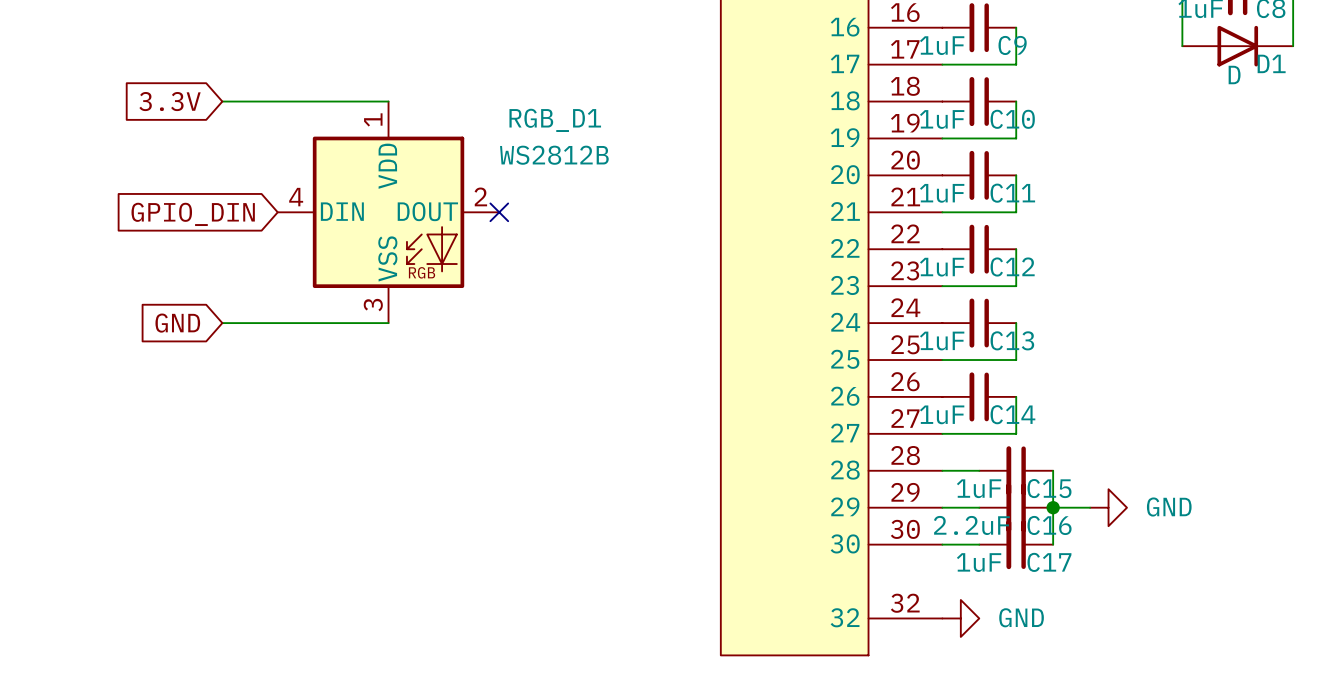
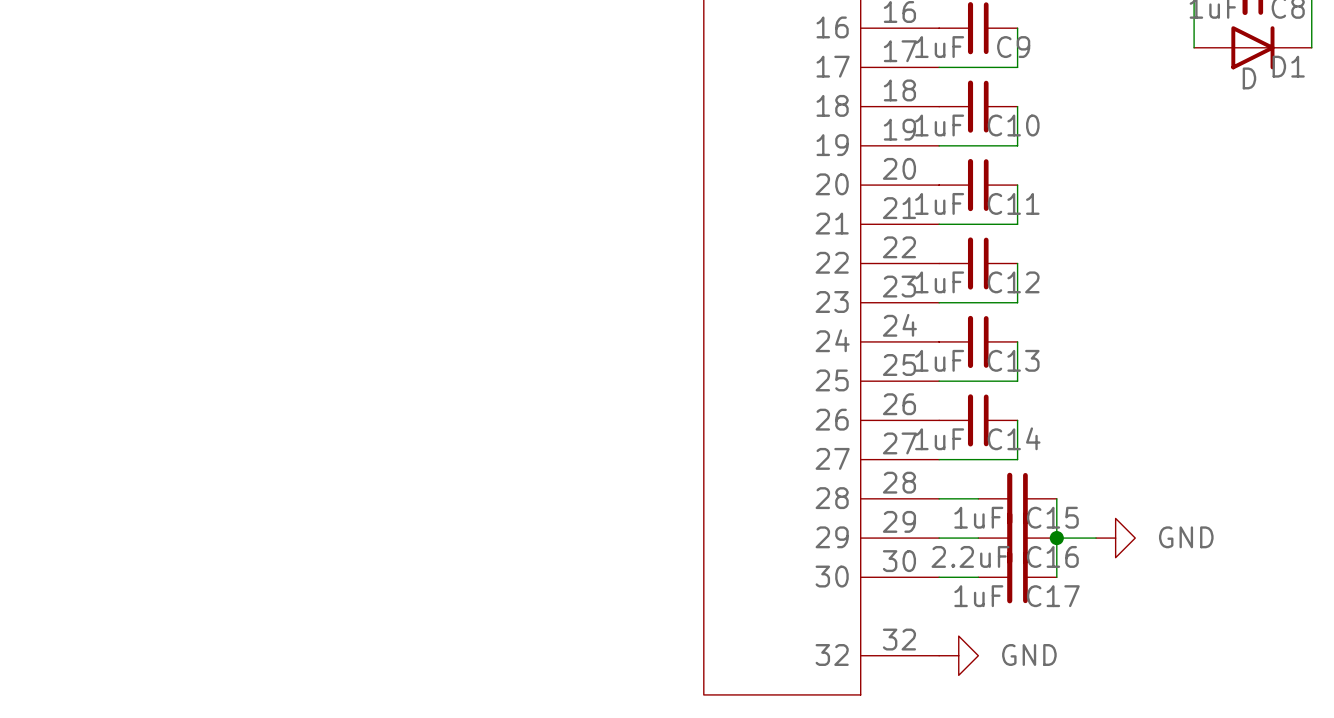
global label: 3.3V (170, 101) -> none
wire: (222, 101) (388, 101) -> none
RGB_D1: WS2812B (388, 212) -> none
no-connect mark: (499, 212) -> none
global label: GPIO_DIN (193, 214) -> none
global label: GND (177, 323) -> none
wire: (222, 323) (388, 323) -> none

